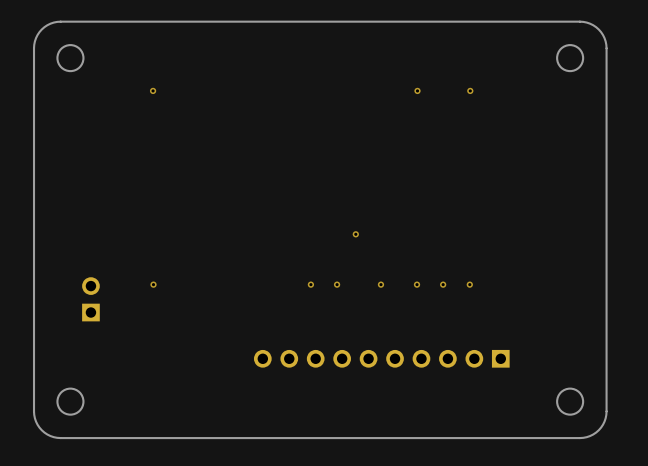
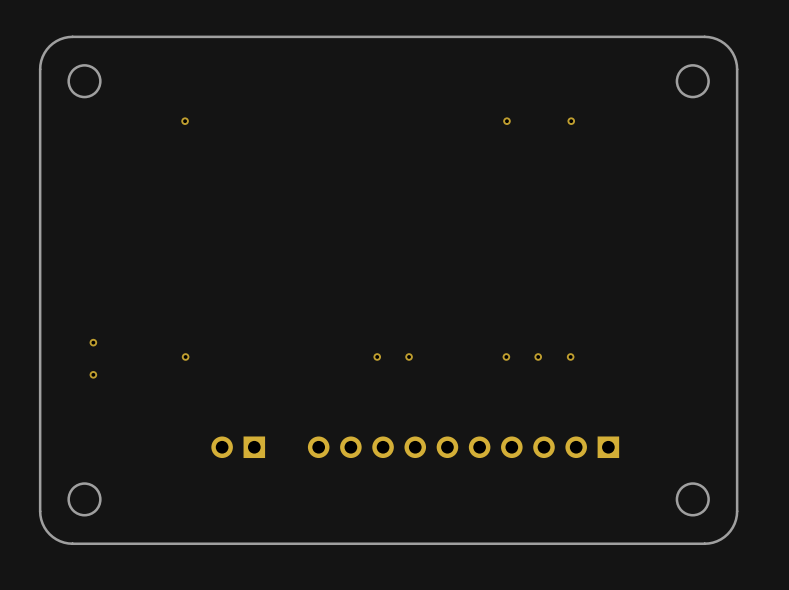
via: (355, 234) -> none
via: none -> (93, 342)
via: (380, 284) -> none
via: none -> (93, 374)
part rotation: 0° (90, 299) -> 90° counterclockwise (238, 447)
part position: (90, 299) -> (238, 447)

